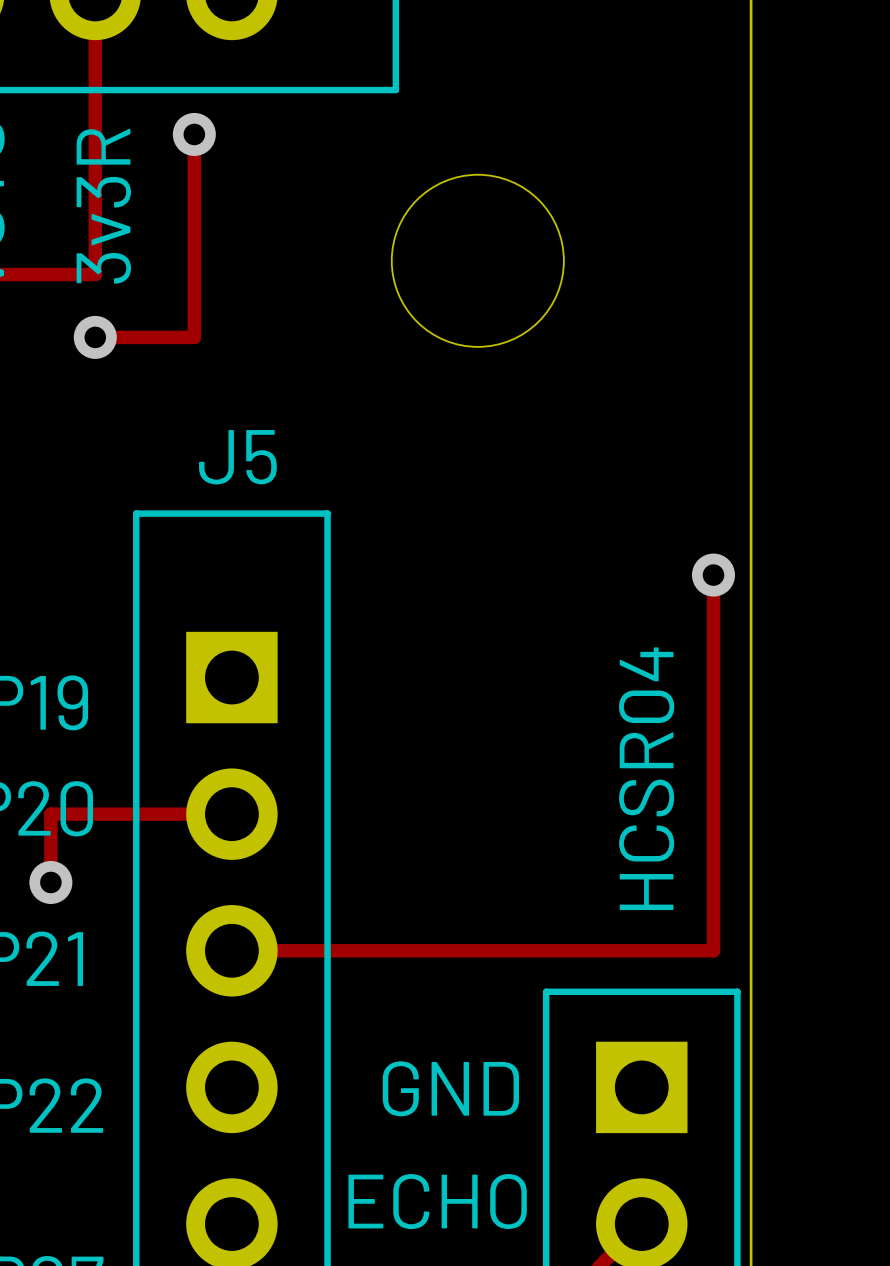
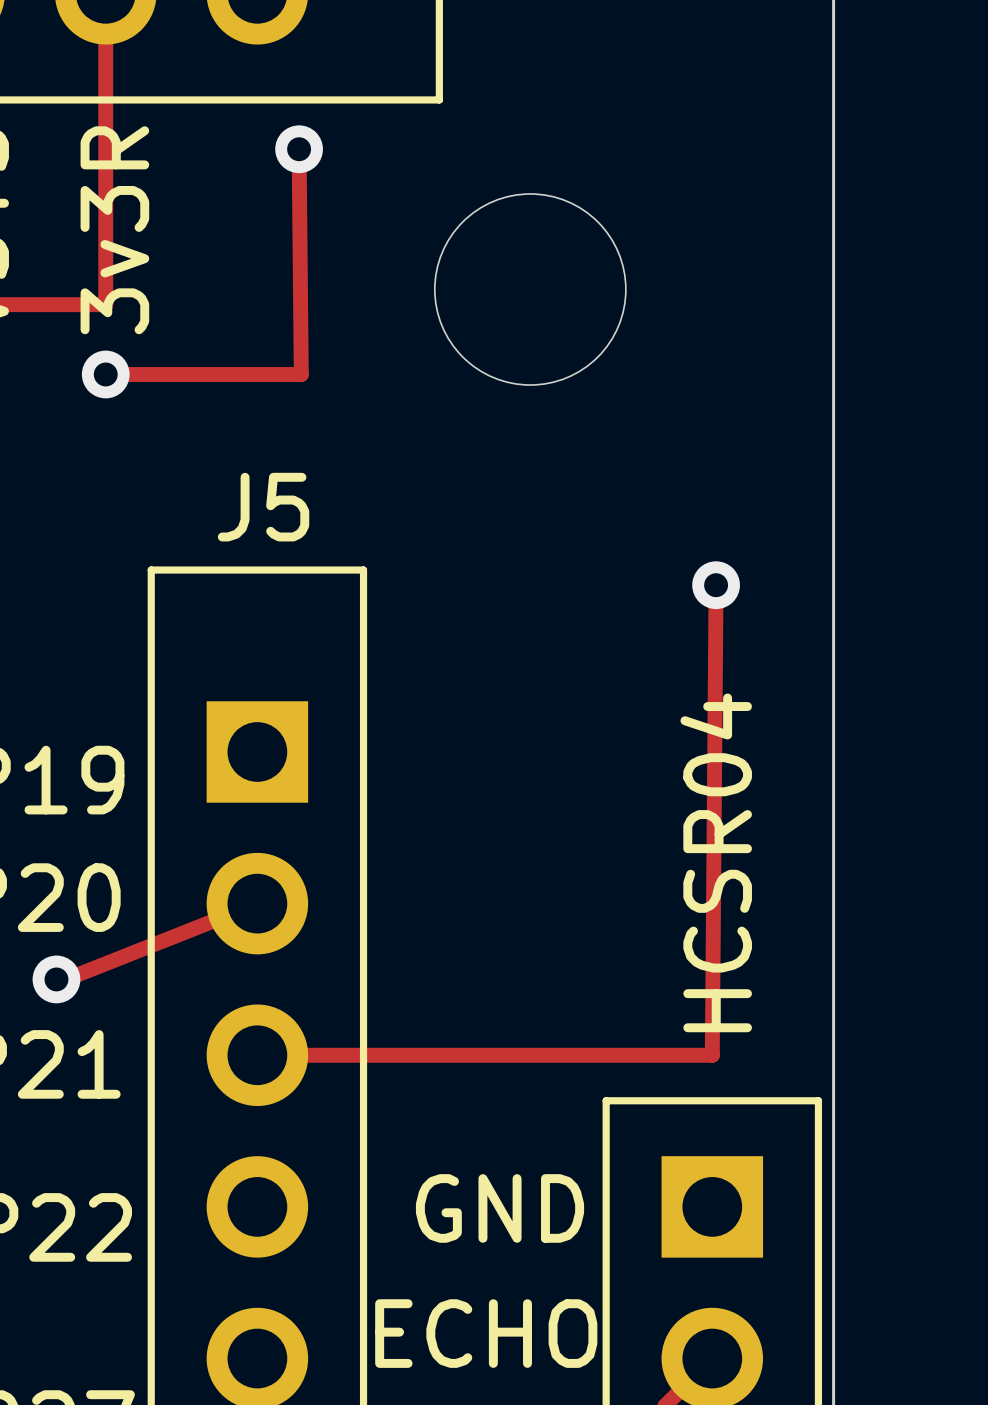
track: (194, 131) (194, 337) -> (299, 149) (301, 374) (215, 374)
via position: (194, 134) -> (299, 149)
track: (713, 568) (713, 950) (641, 950) -> (716, 585) (712, 1055)
via position: (713, 575) -> (716, 585)
track: (231, 814) (50, 814) (50, 882) -> (257, 903) (56, 983)

